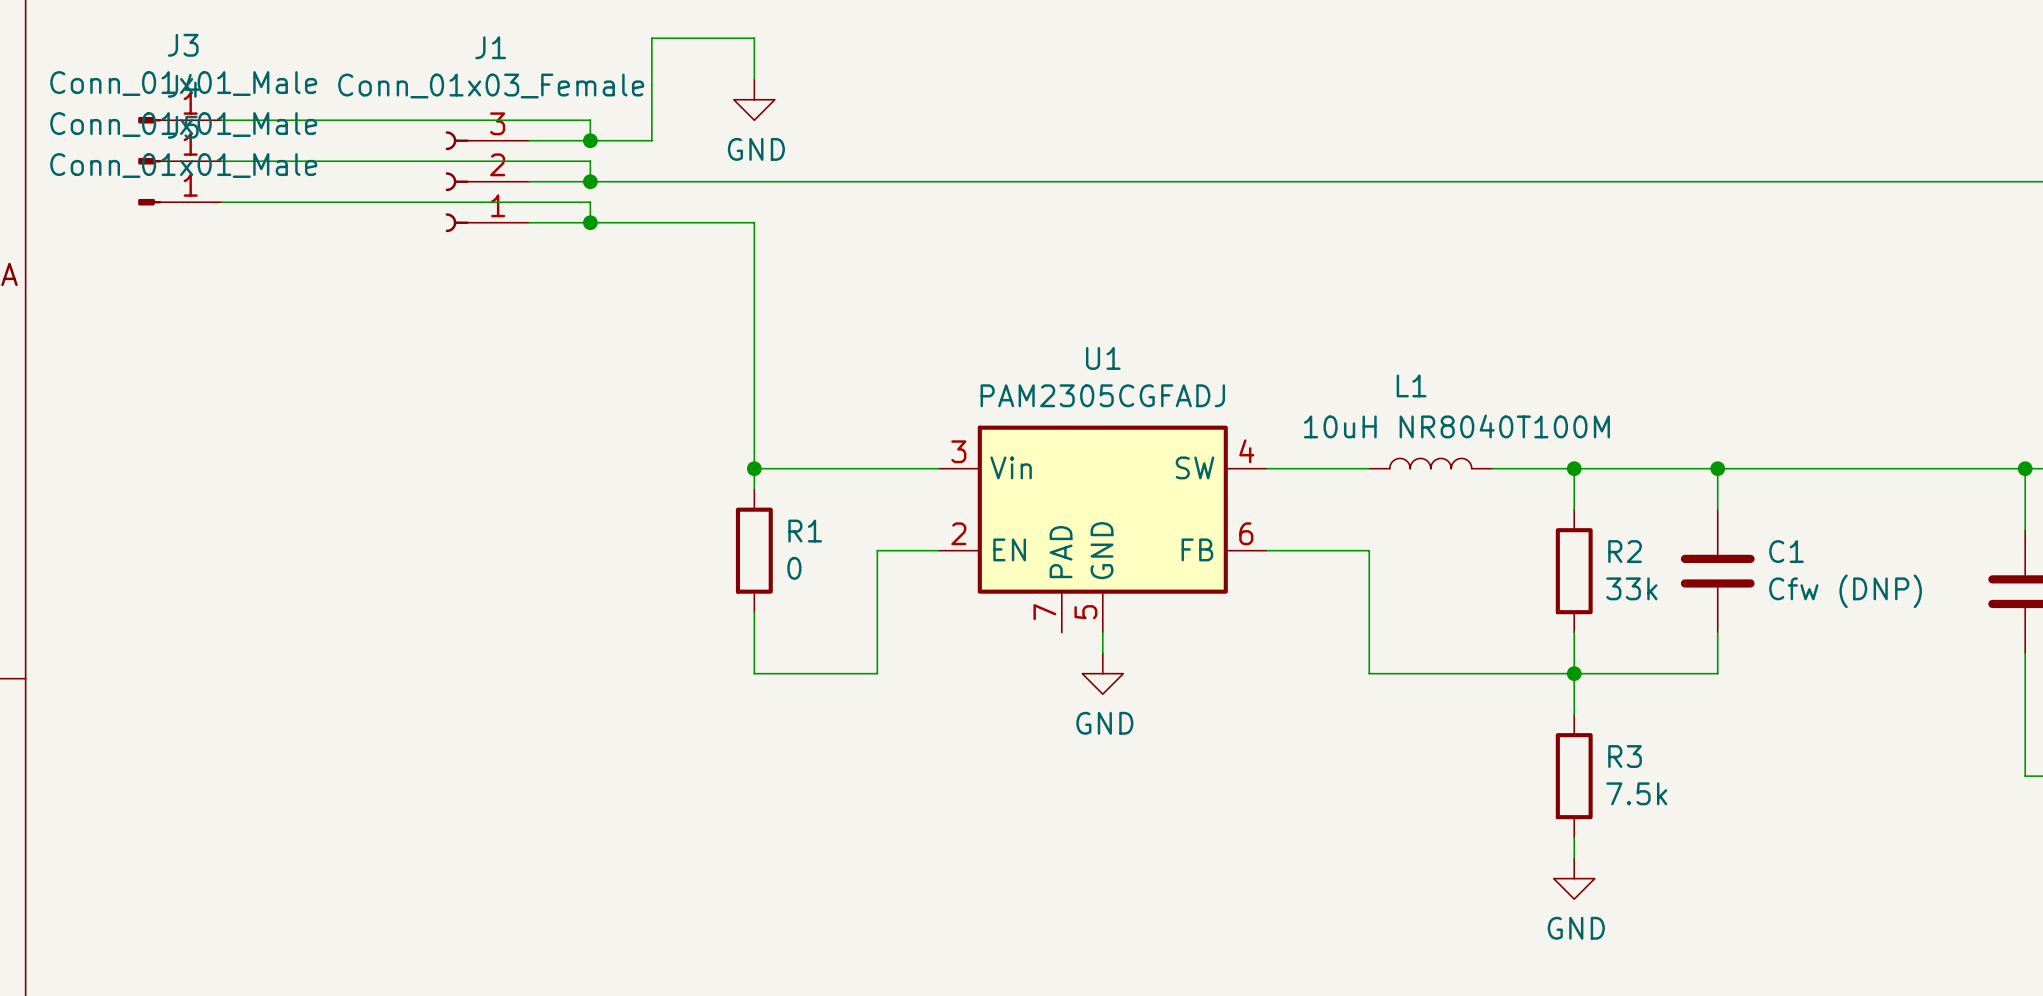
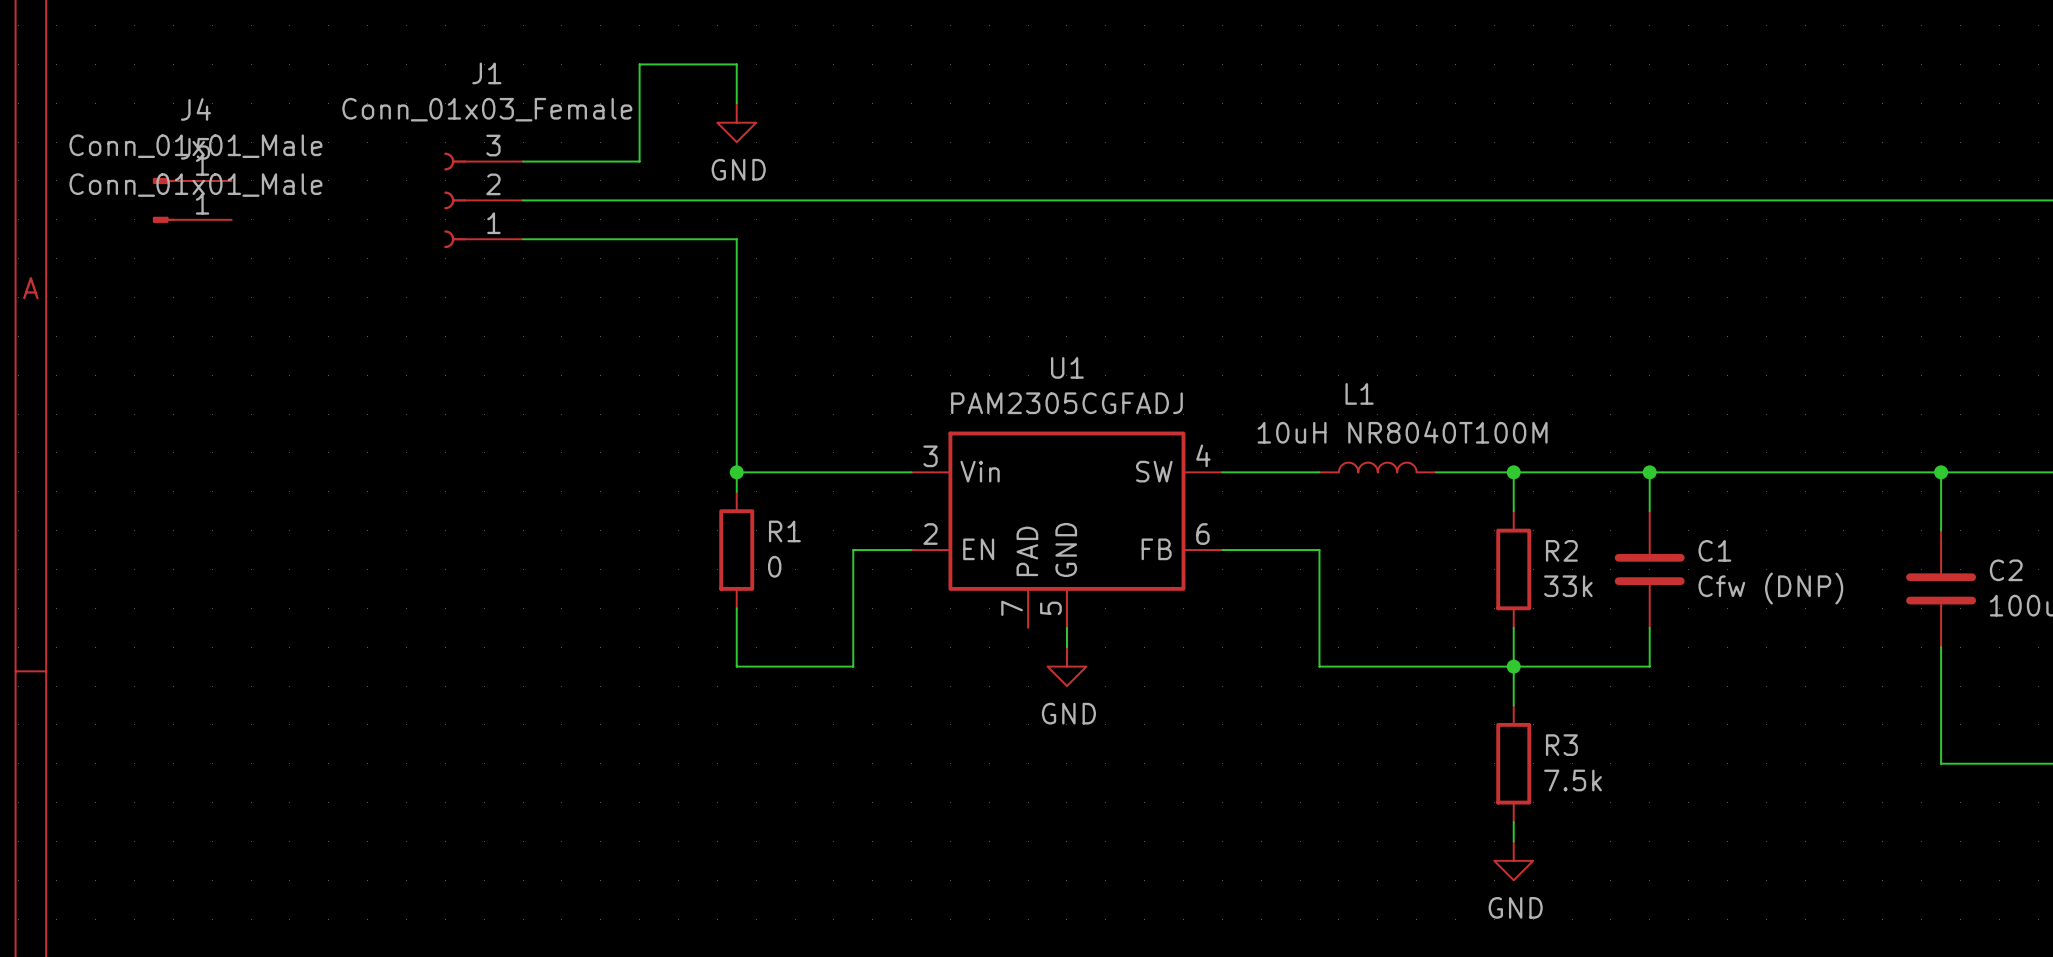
J3: Conn_01x01_Male (179, 120) -> none
wire: (221, 120) (590, 120) (590, 140) -> none
junction: (590, 140) -> none
wire: (221, 161) (590, 161) (590, 181) -> none
junction: (590, 181) -> none
wire: (221, 202) (590, 202) (590, 222) -> none
junction: (590, 222) -> none

